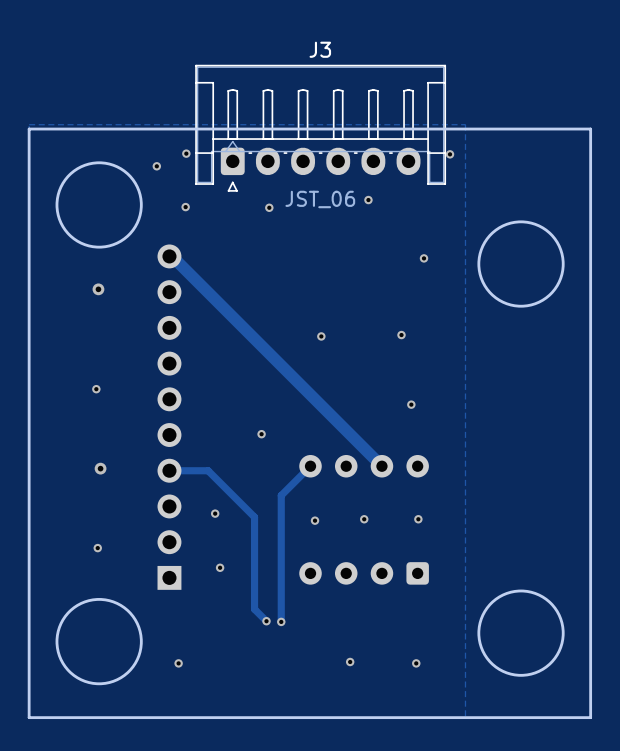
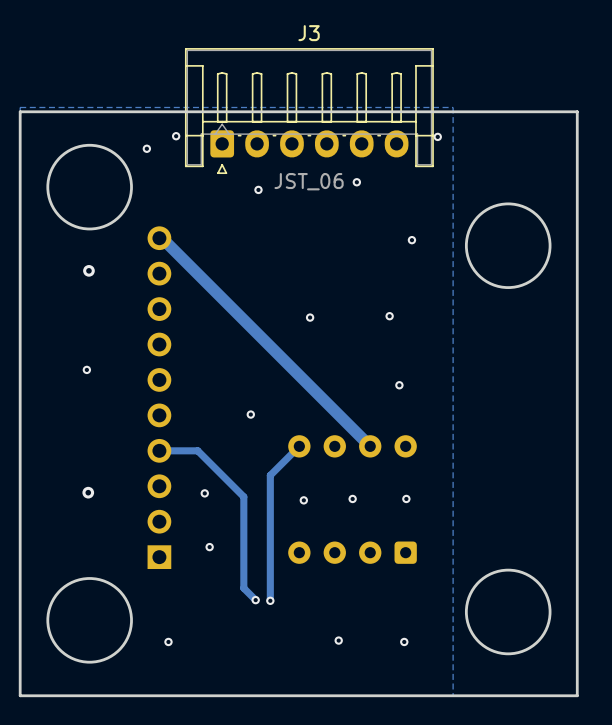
via: (185, 207) -> none
via position: (100, 468) -> (88, 492)
via: (97, 548) -> none

